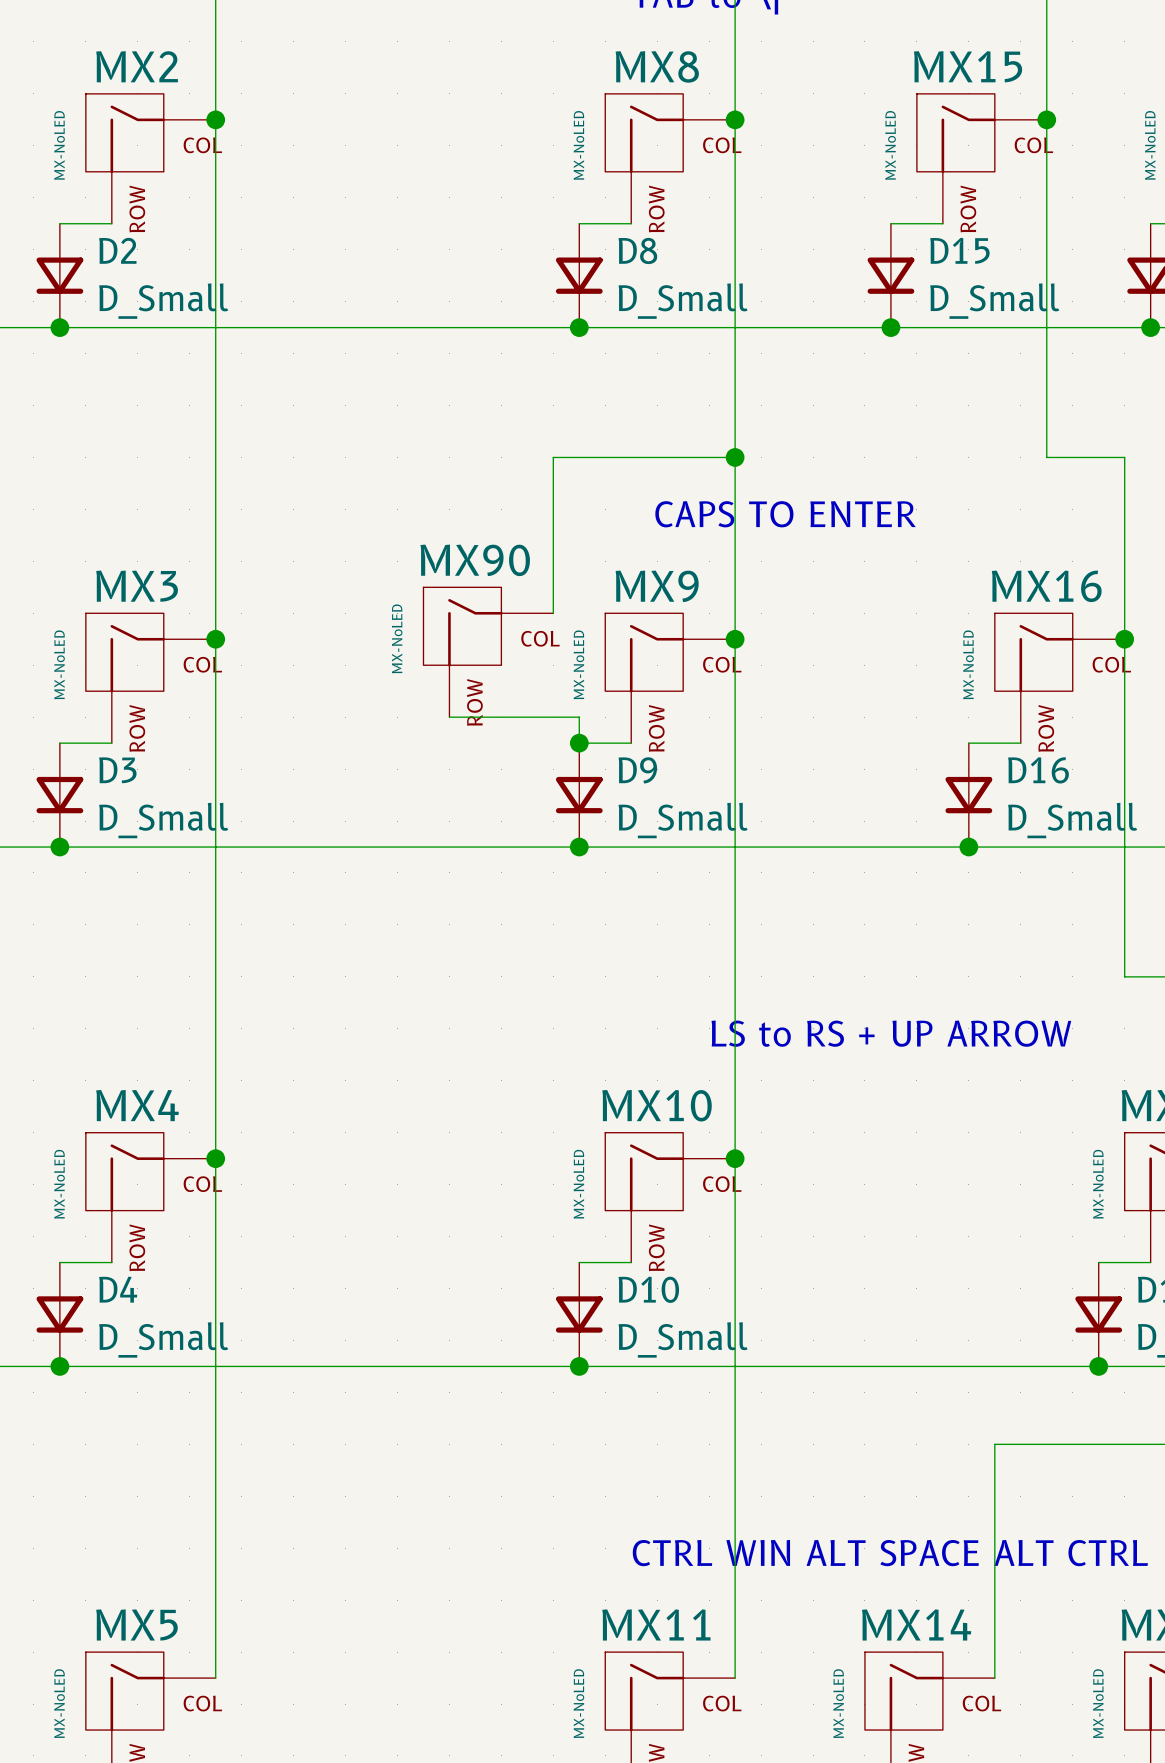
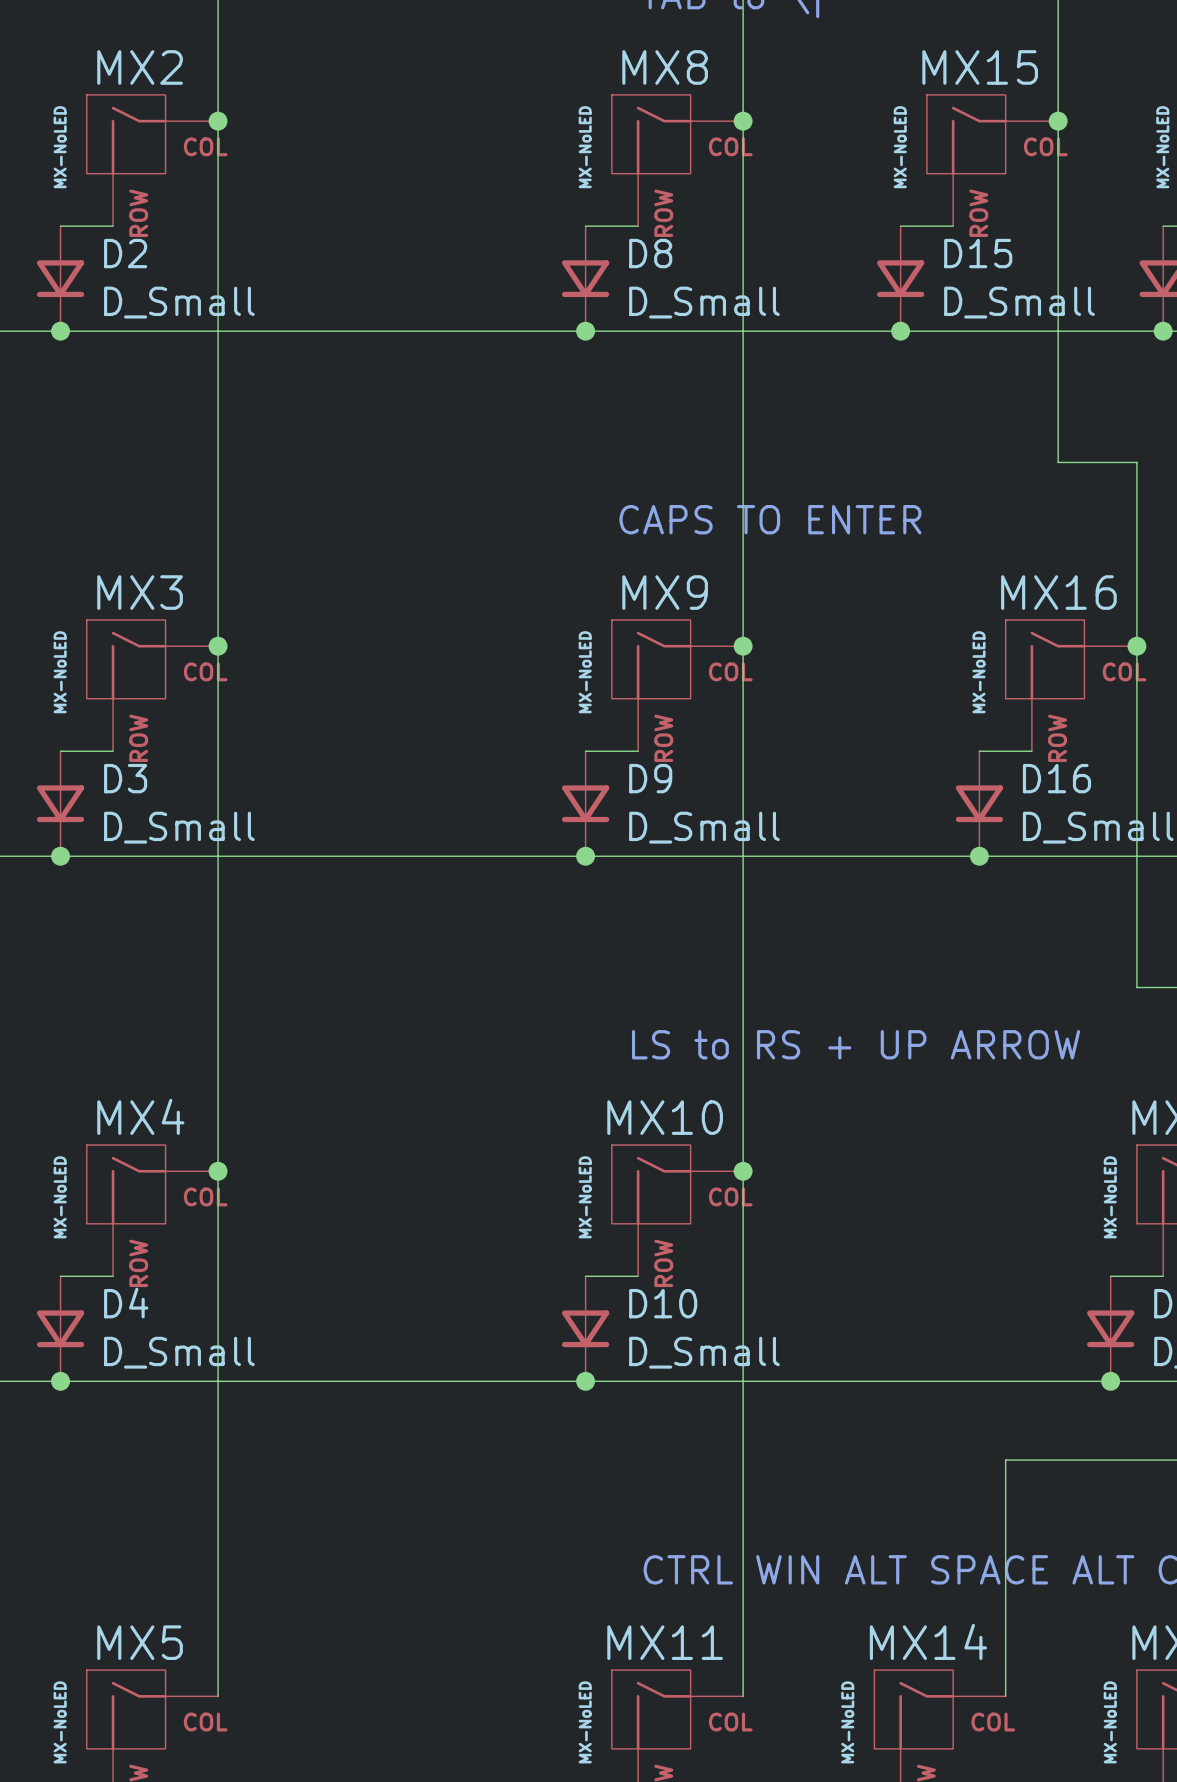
wire: (735, 457) (553, 457) (553, 613) -> none
junction: (735, 457) -> none
MX90: MX-NoLED (488, 652) -> none
wire: (449, 717) (579, 717) (579, 743) -> none
junction: (579, 743) -> none

